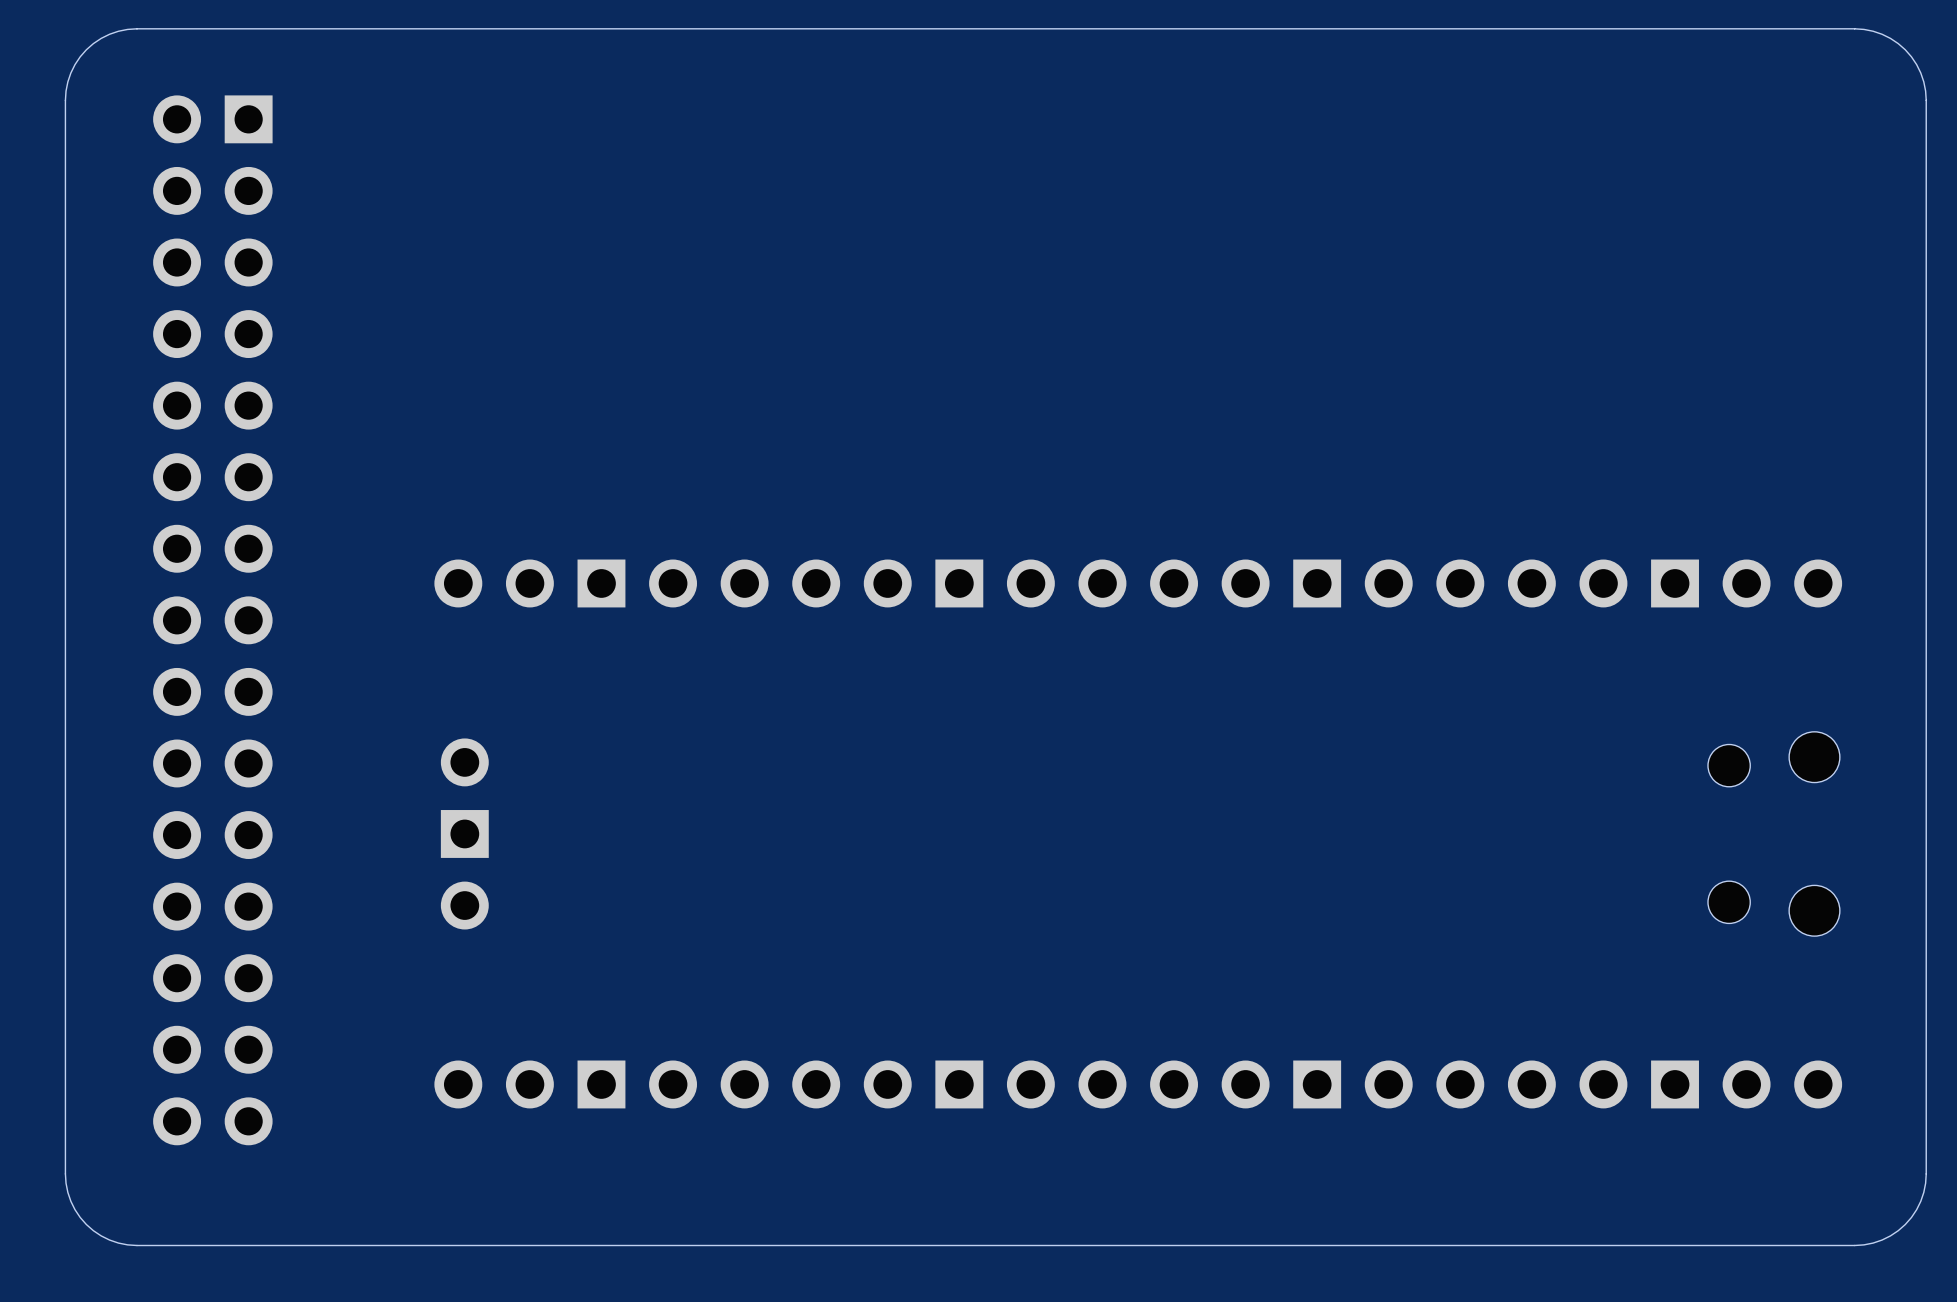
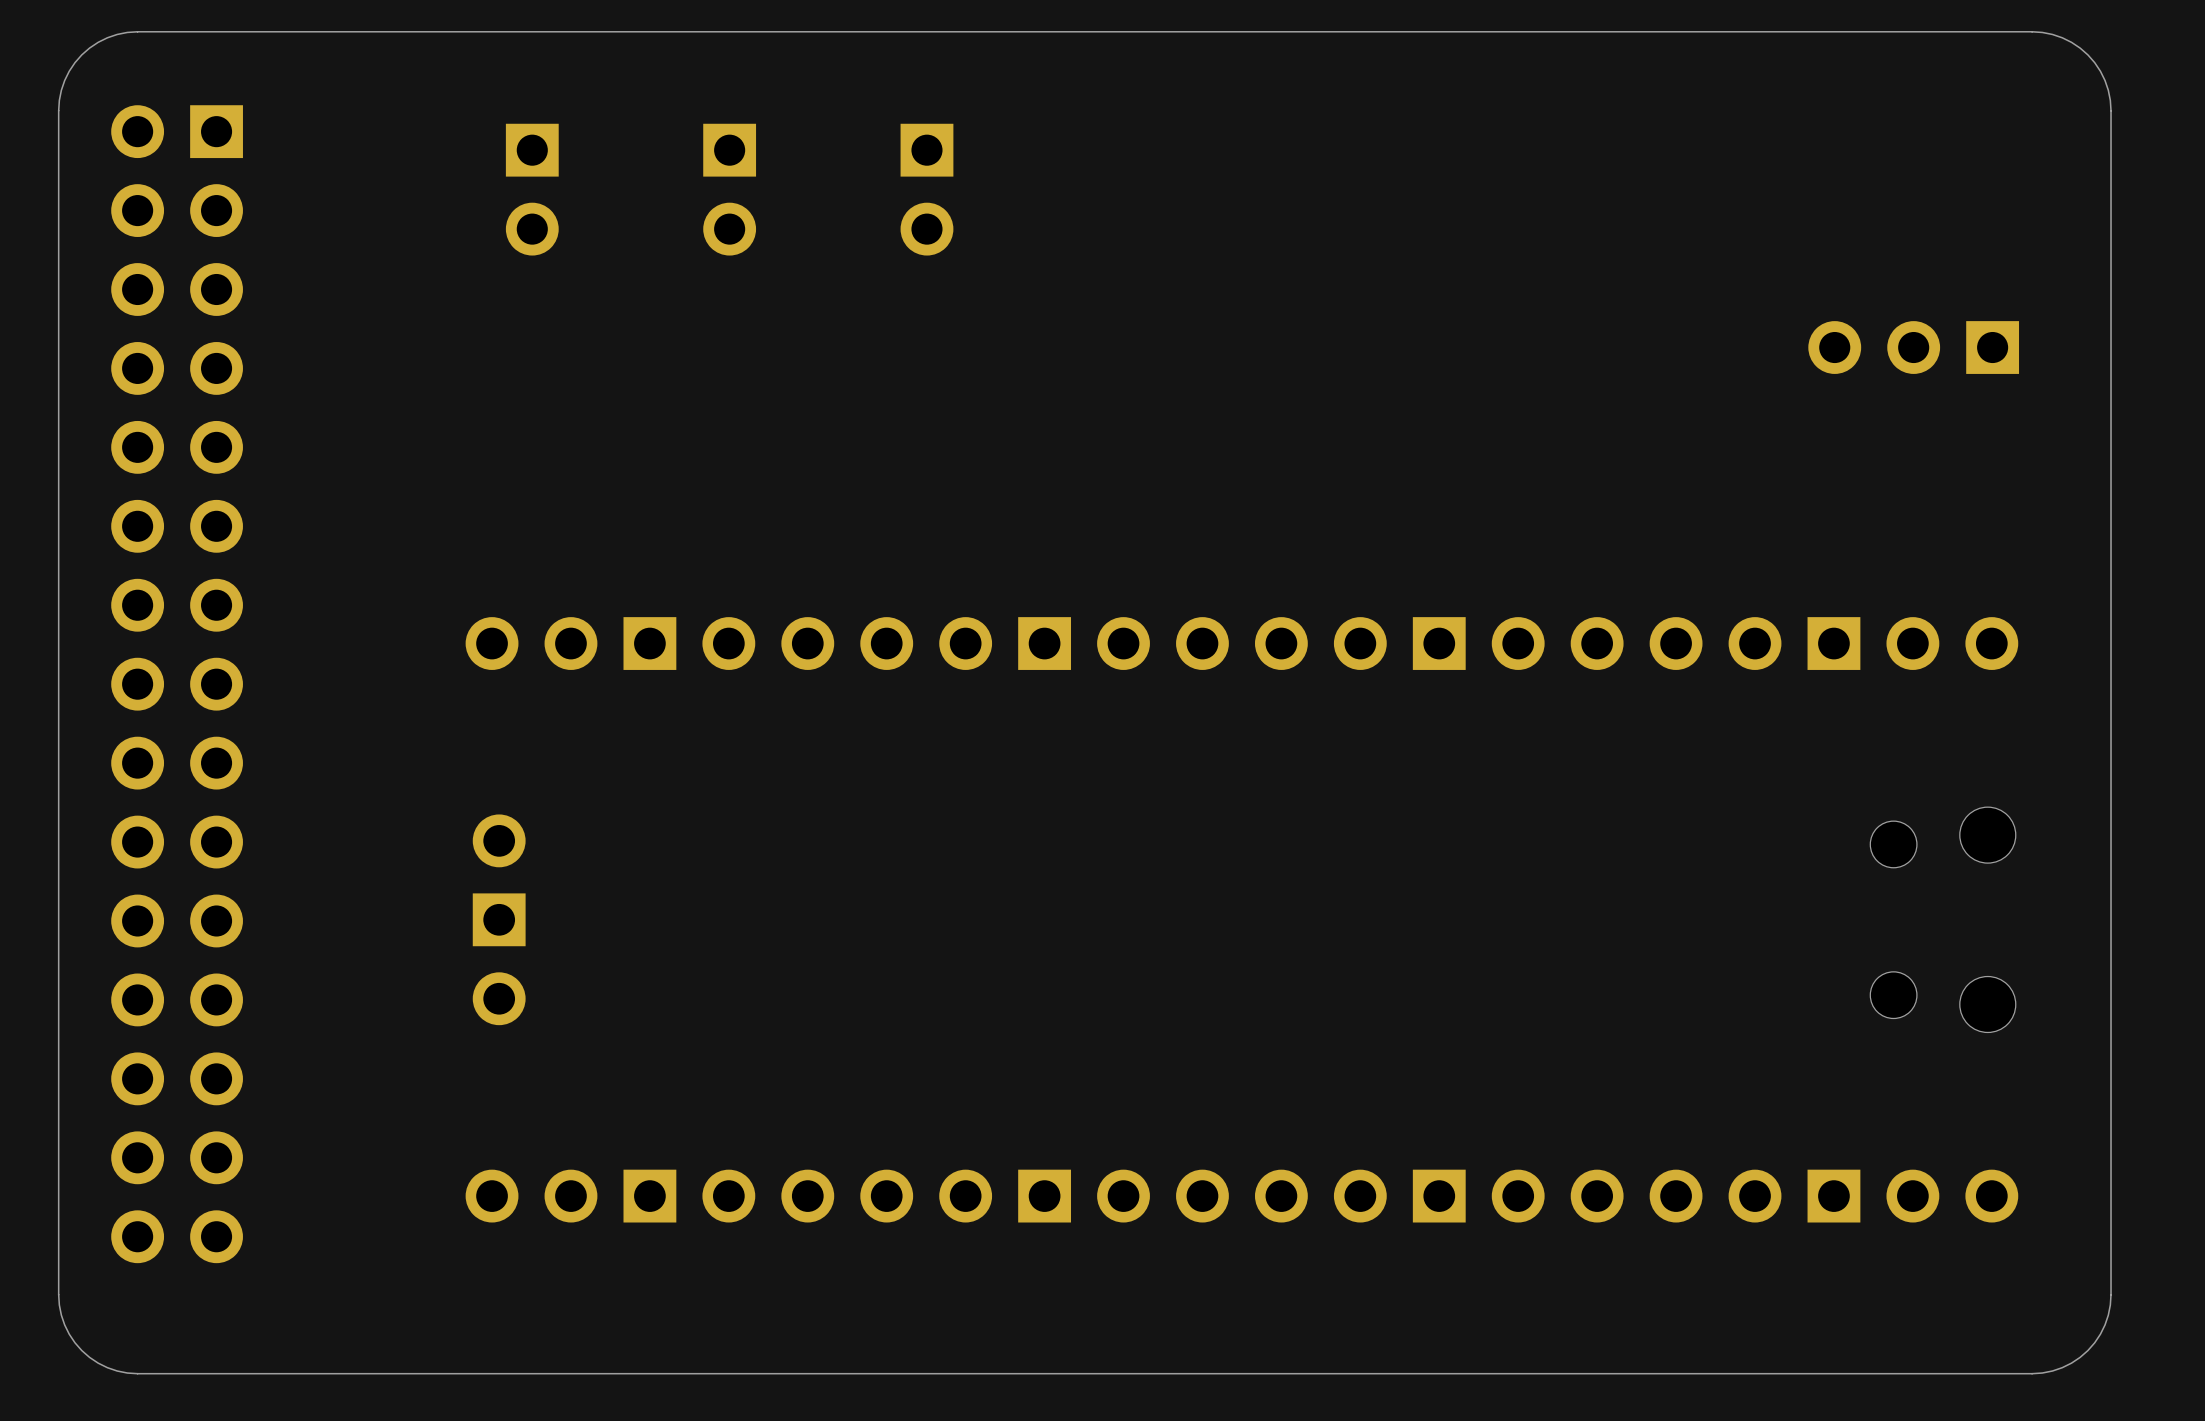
part: none -> (532, 189)
part: none -> (729, 189)
part: none -> (926, 189)
part: none -> (1913, 347)
part position: (212, 620) -> (177, 684)

